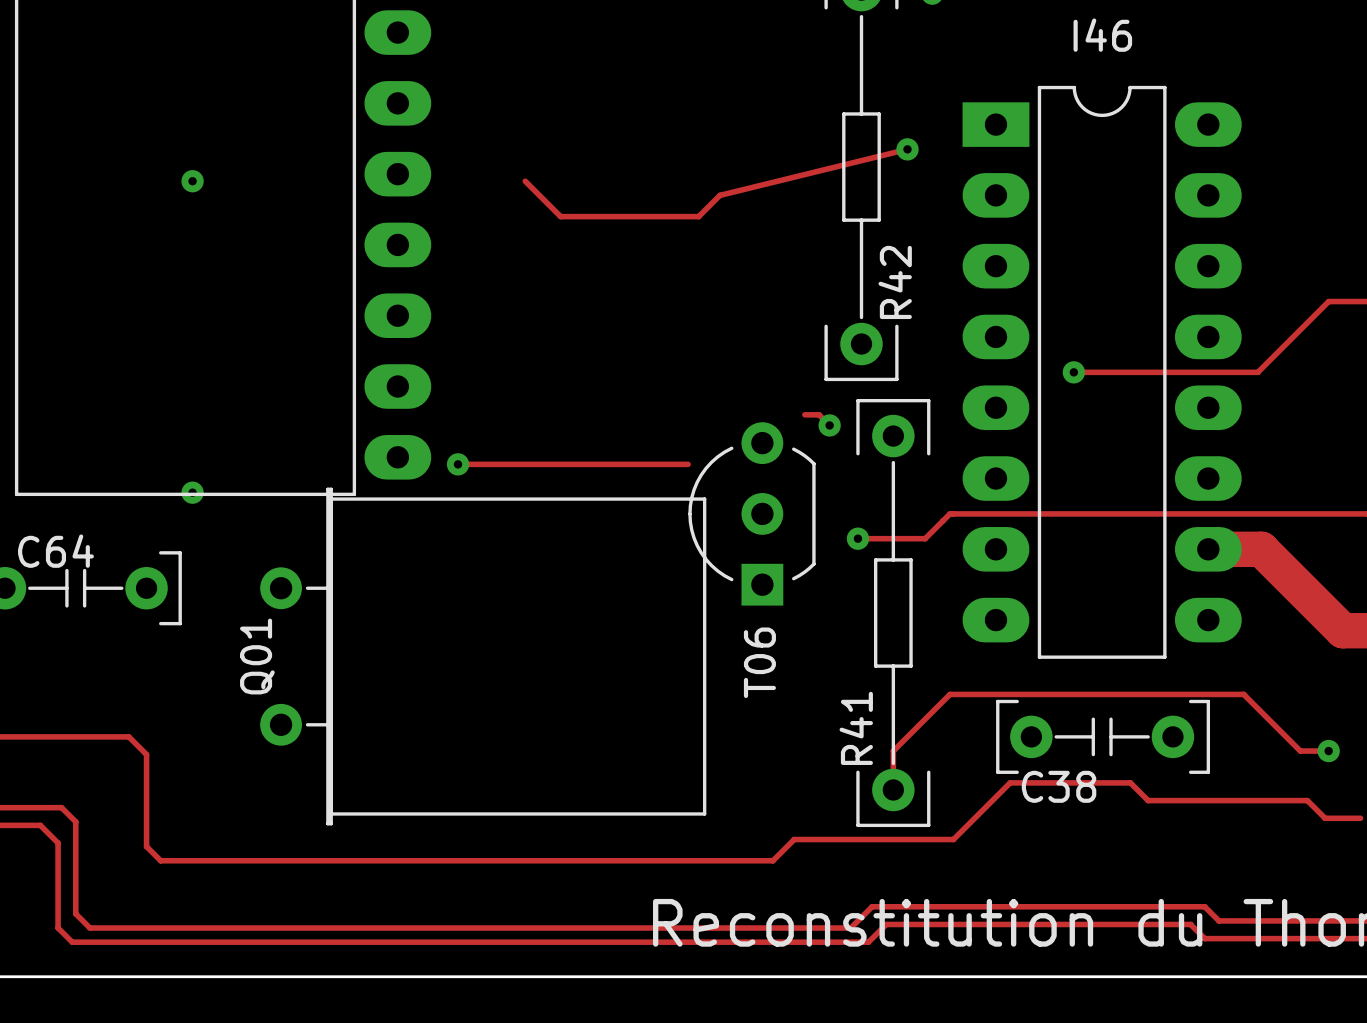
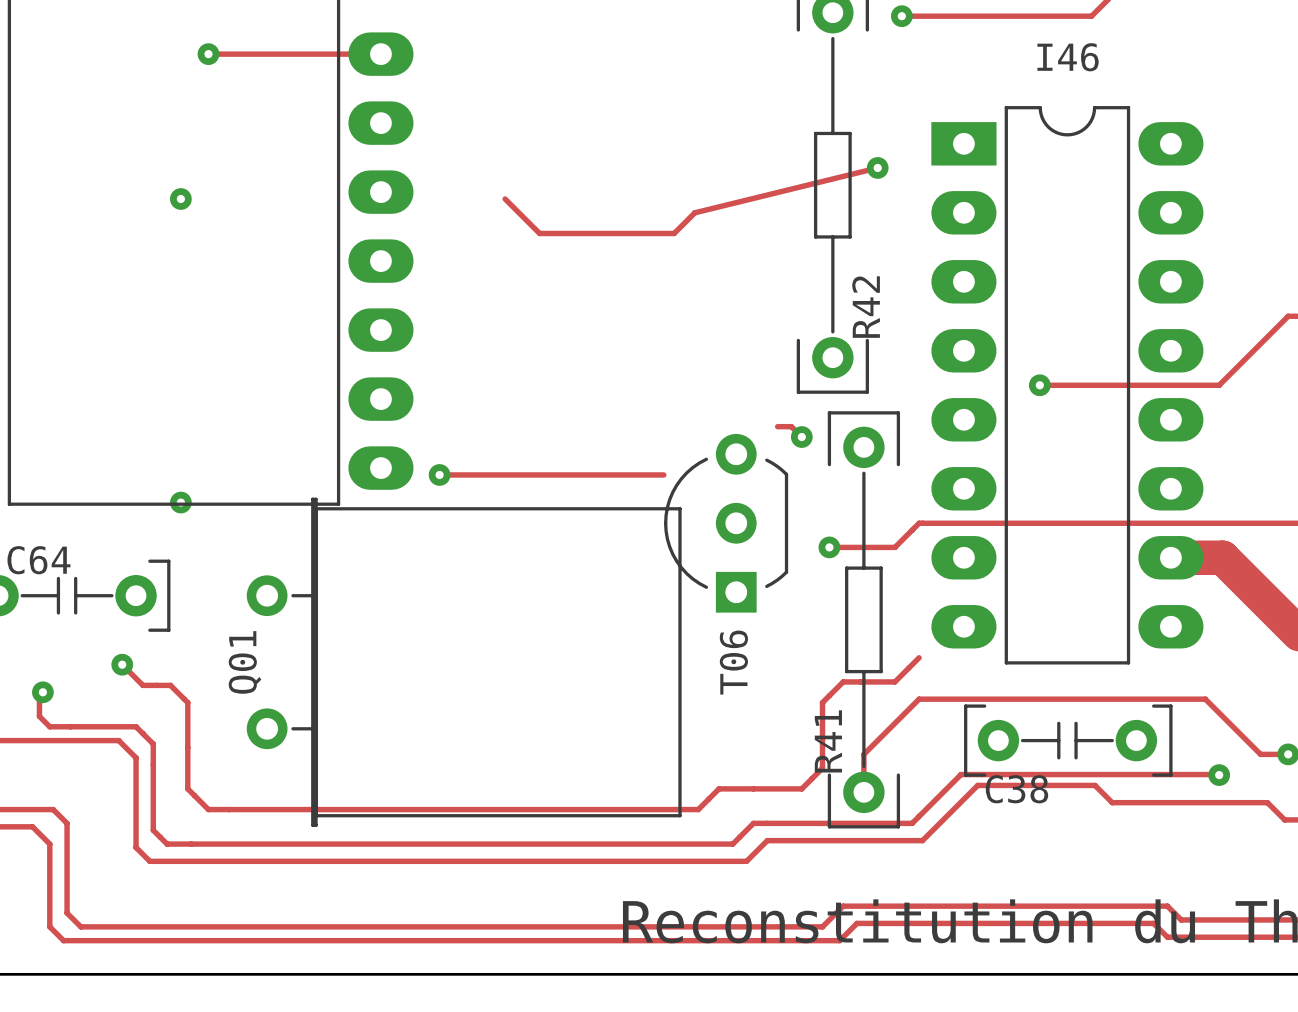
track: none -> (208, 54) (380, 54)
via: none -> (208, 54)
track: none -> (919, 657) (894, 681) (843, 681) (822, 702) (822, 768) (801, 788) (719, 788) (698, 809) (208, 809) (187, 788) (187, 702) (170, 685) (142, 685) (122, 664)
via: none -> (122, 664)
track: none -> (42, 692) (39, 695) (39, 716) (49, 726) (136, 726) (153, 744) (153, 830) (167, 844) (732, 844) (753, 823) (912, 823) (961, 774) (1219, 775)
via: none -> (42, 692)
via: none -> (1219, 775)

